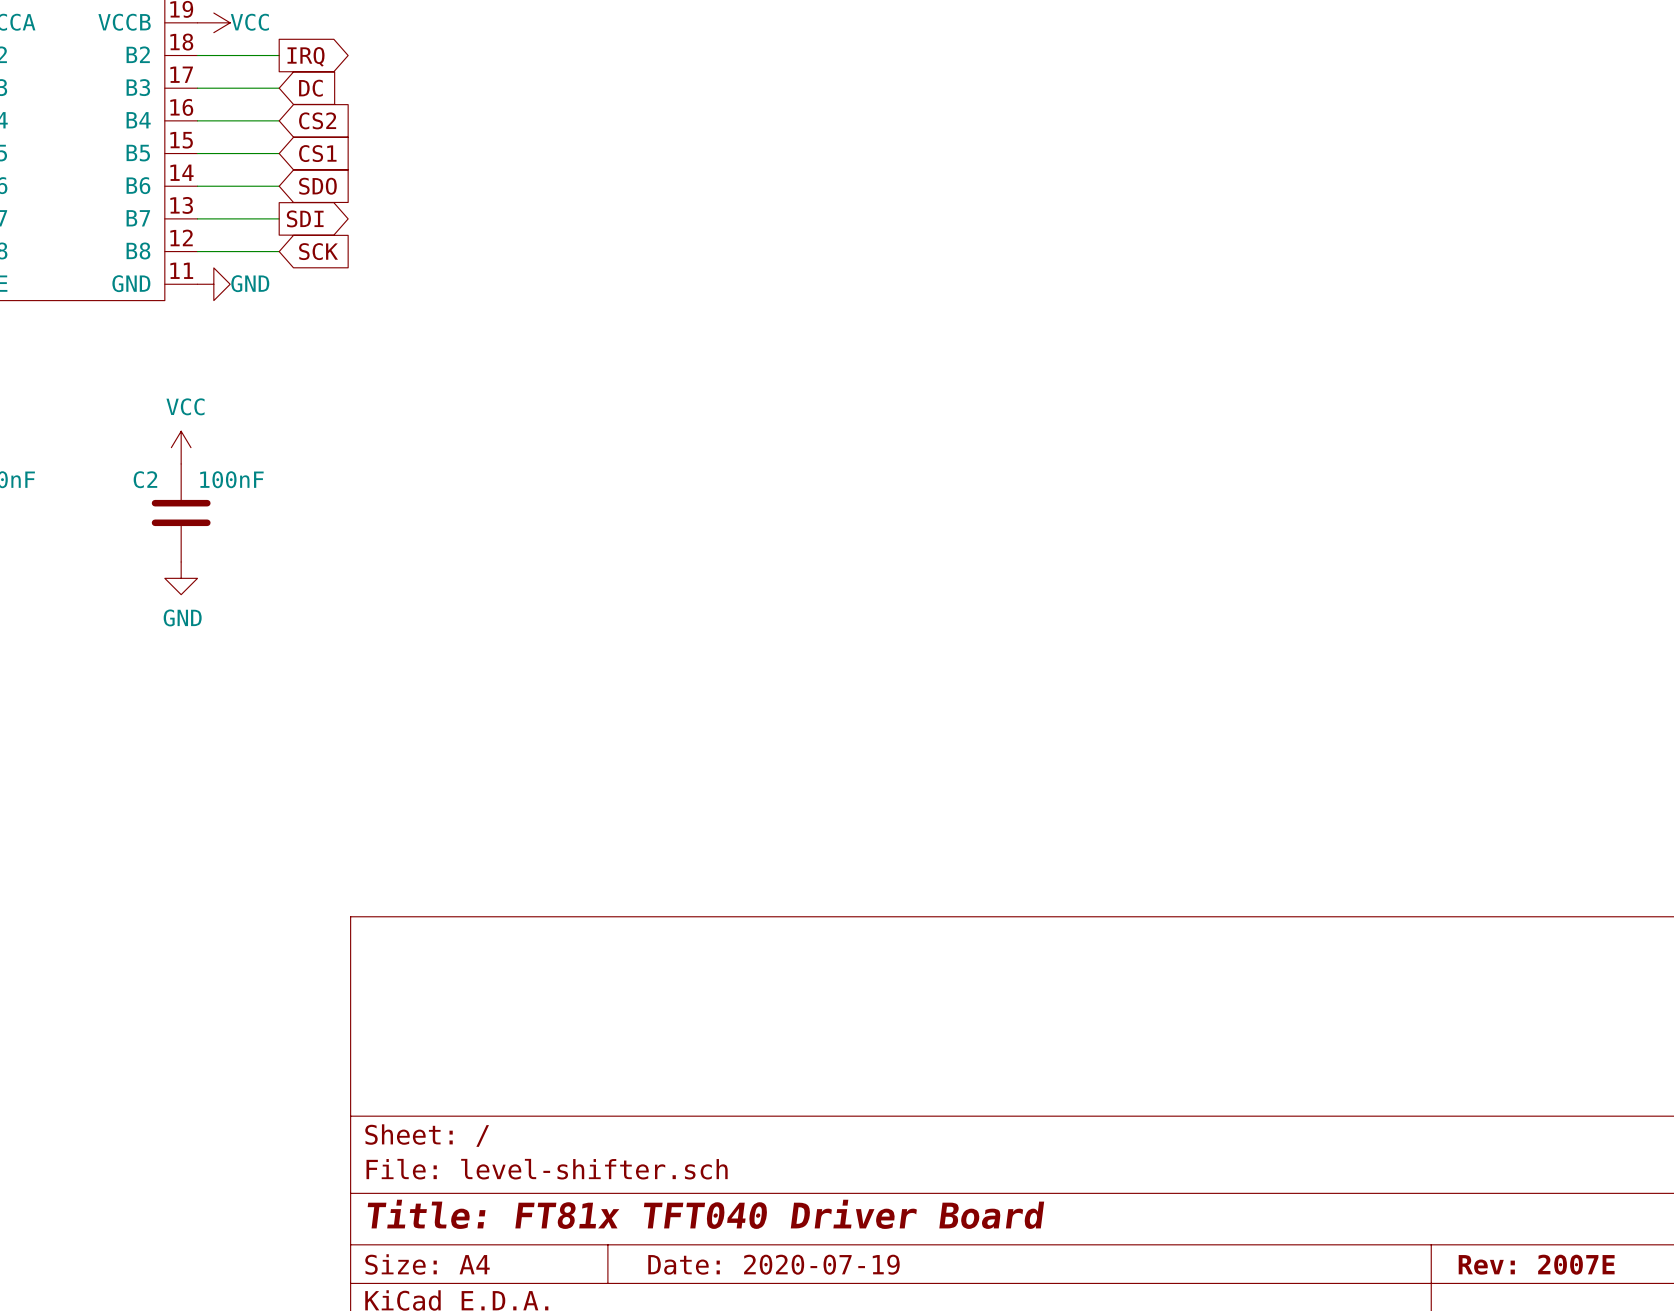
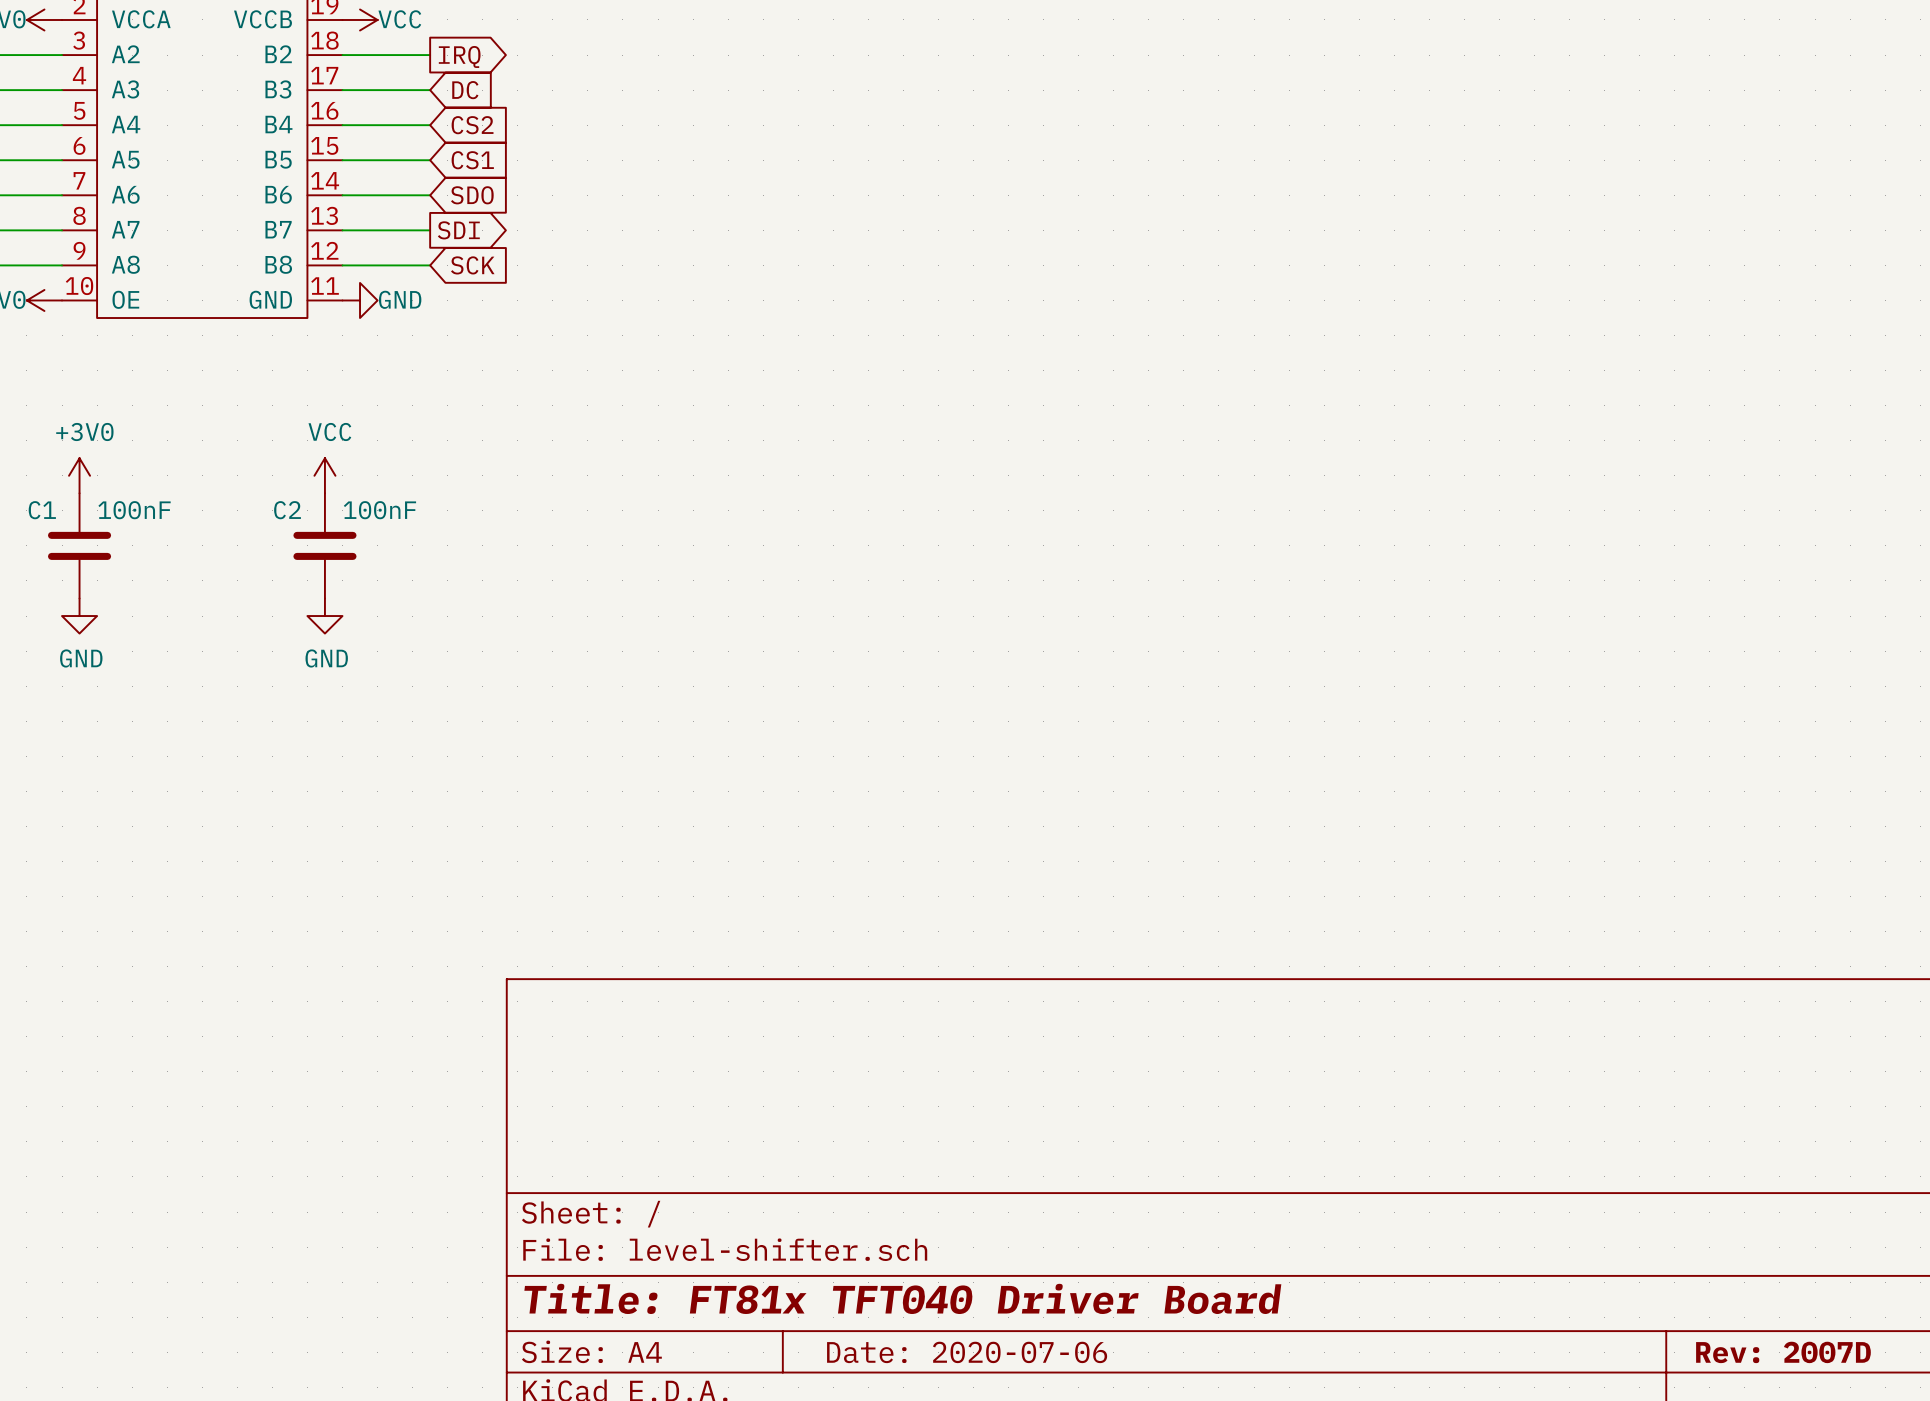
title block: Date: 2020-07-19 (773, 1264) -> Date: 2020-07-06 (967, 1352)
title block: Rev: 2007E (1536, 1264) -> Rev: 2007D (1783, 1352)

